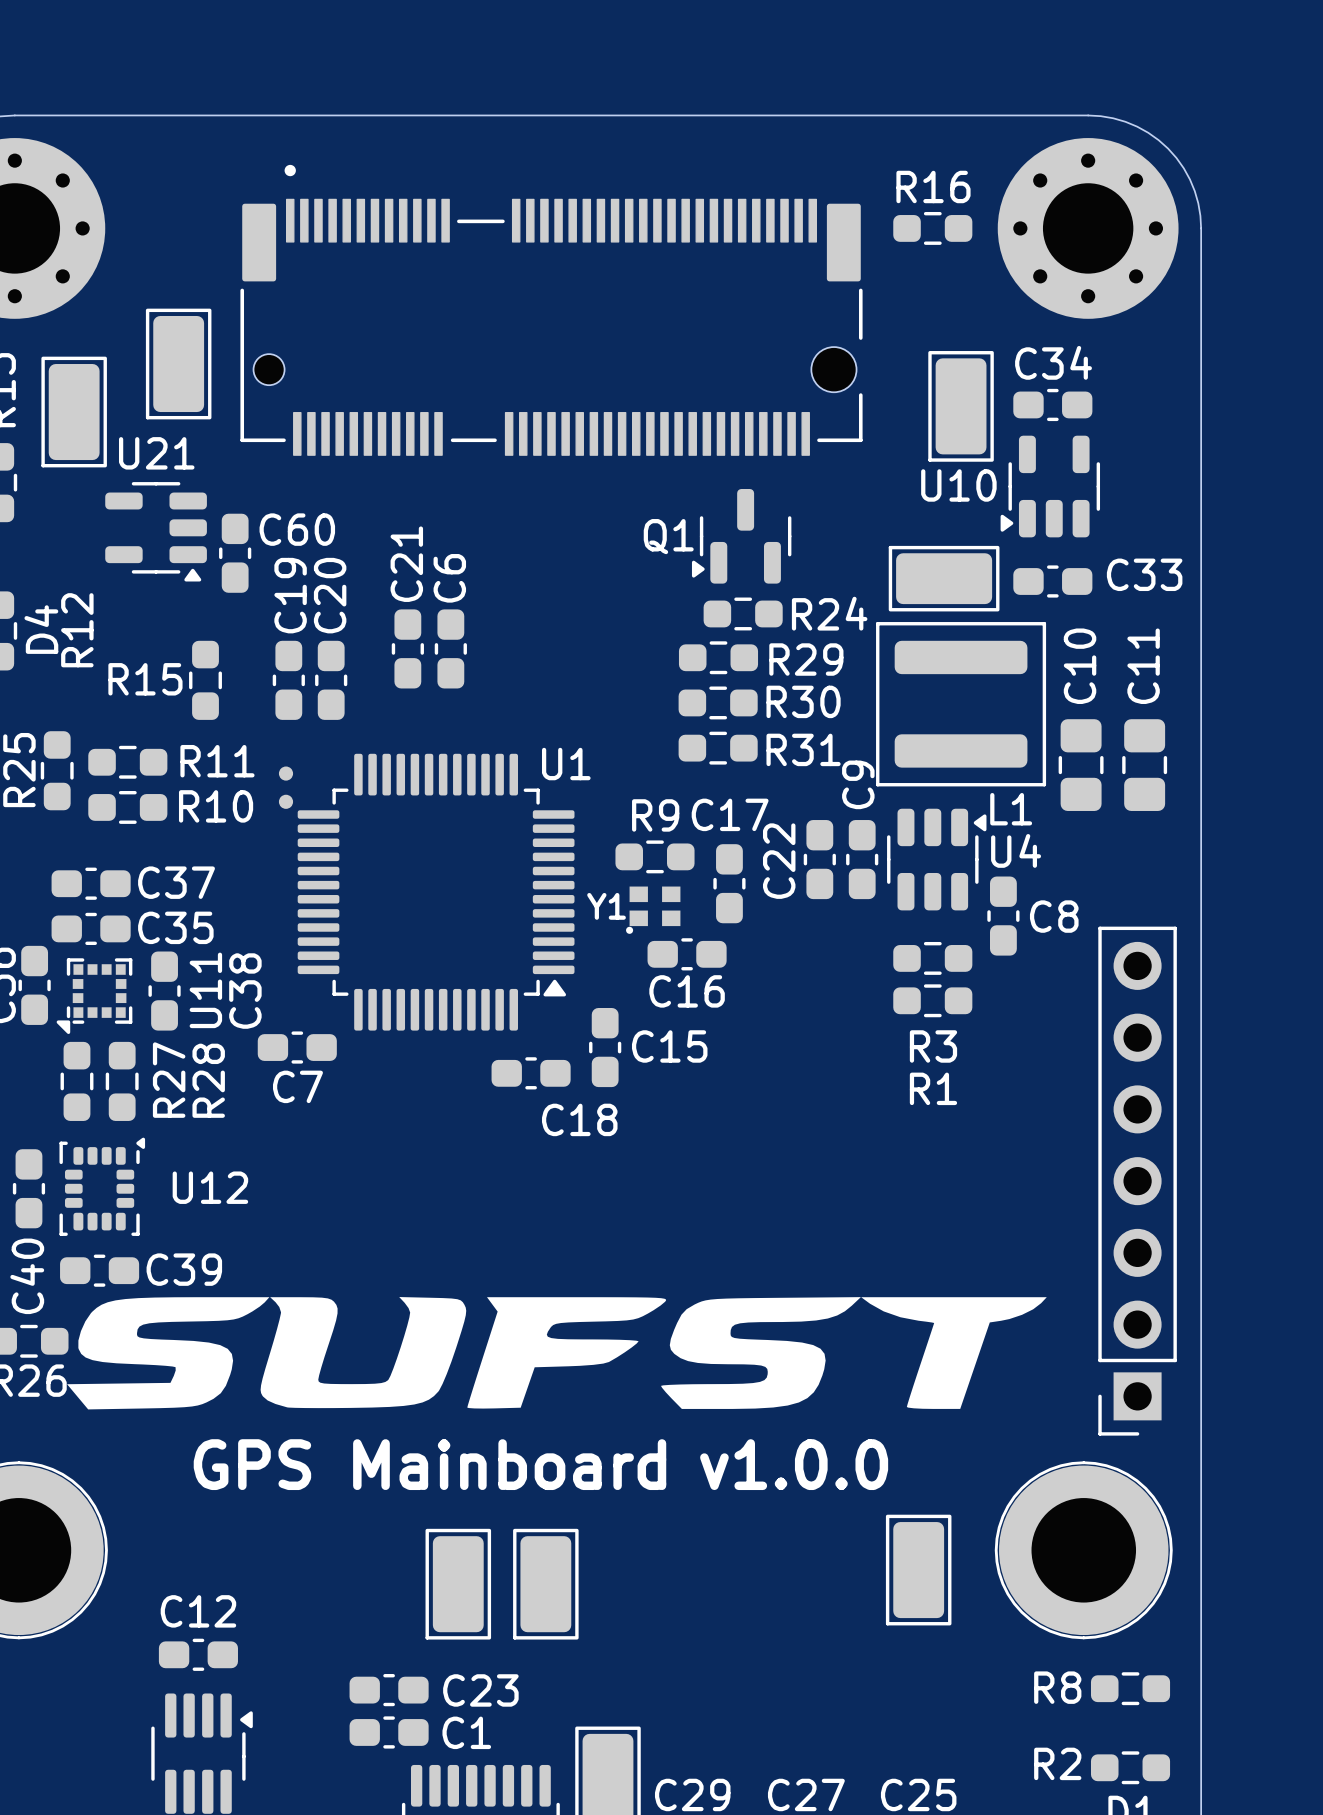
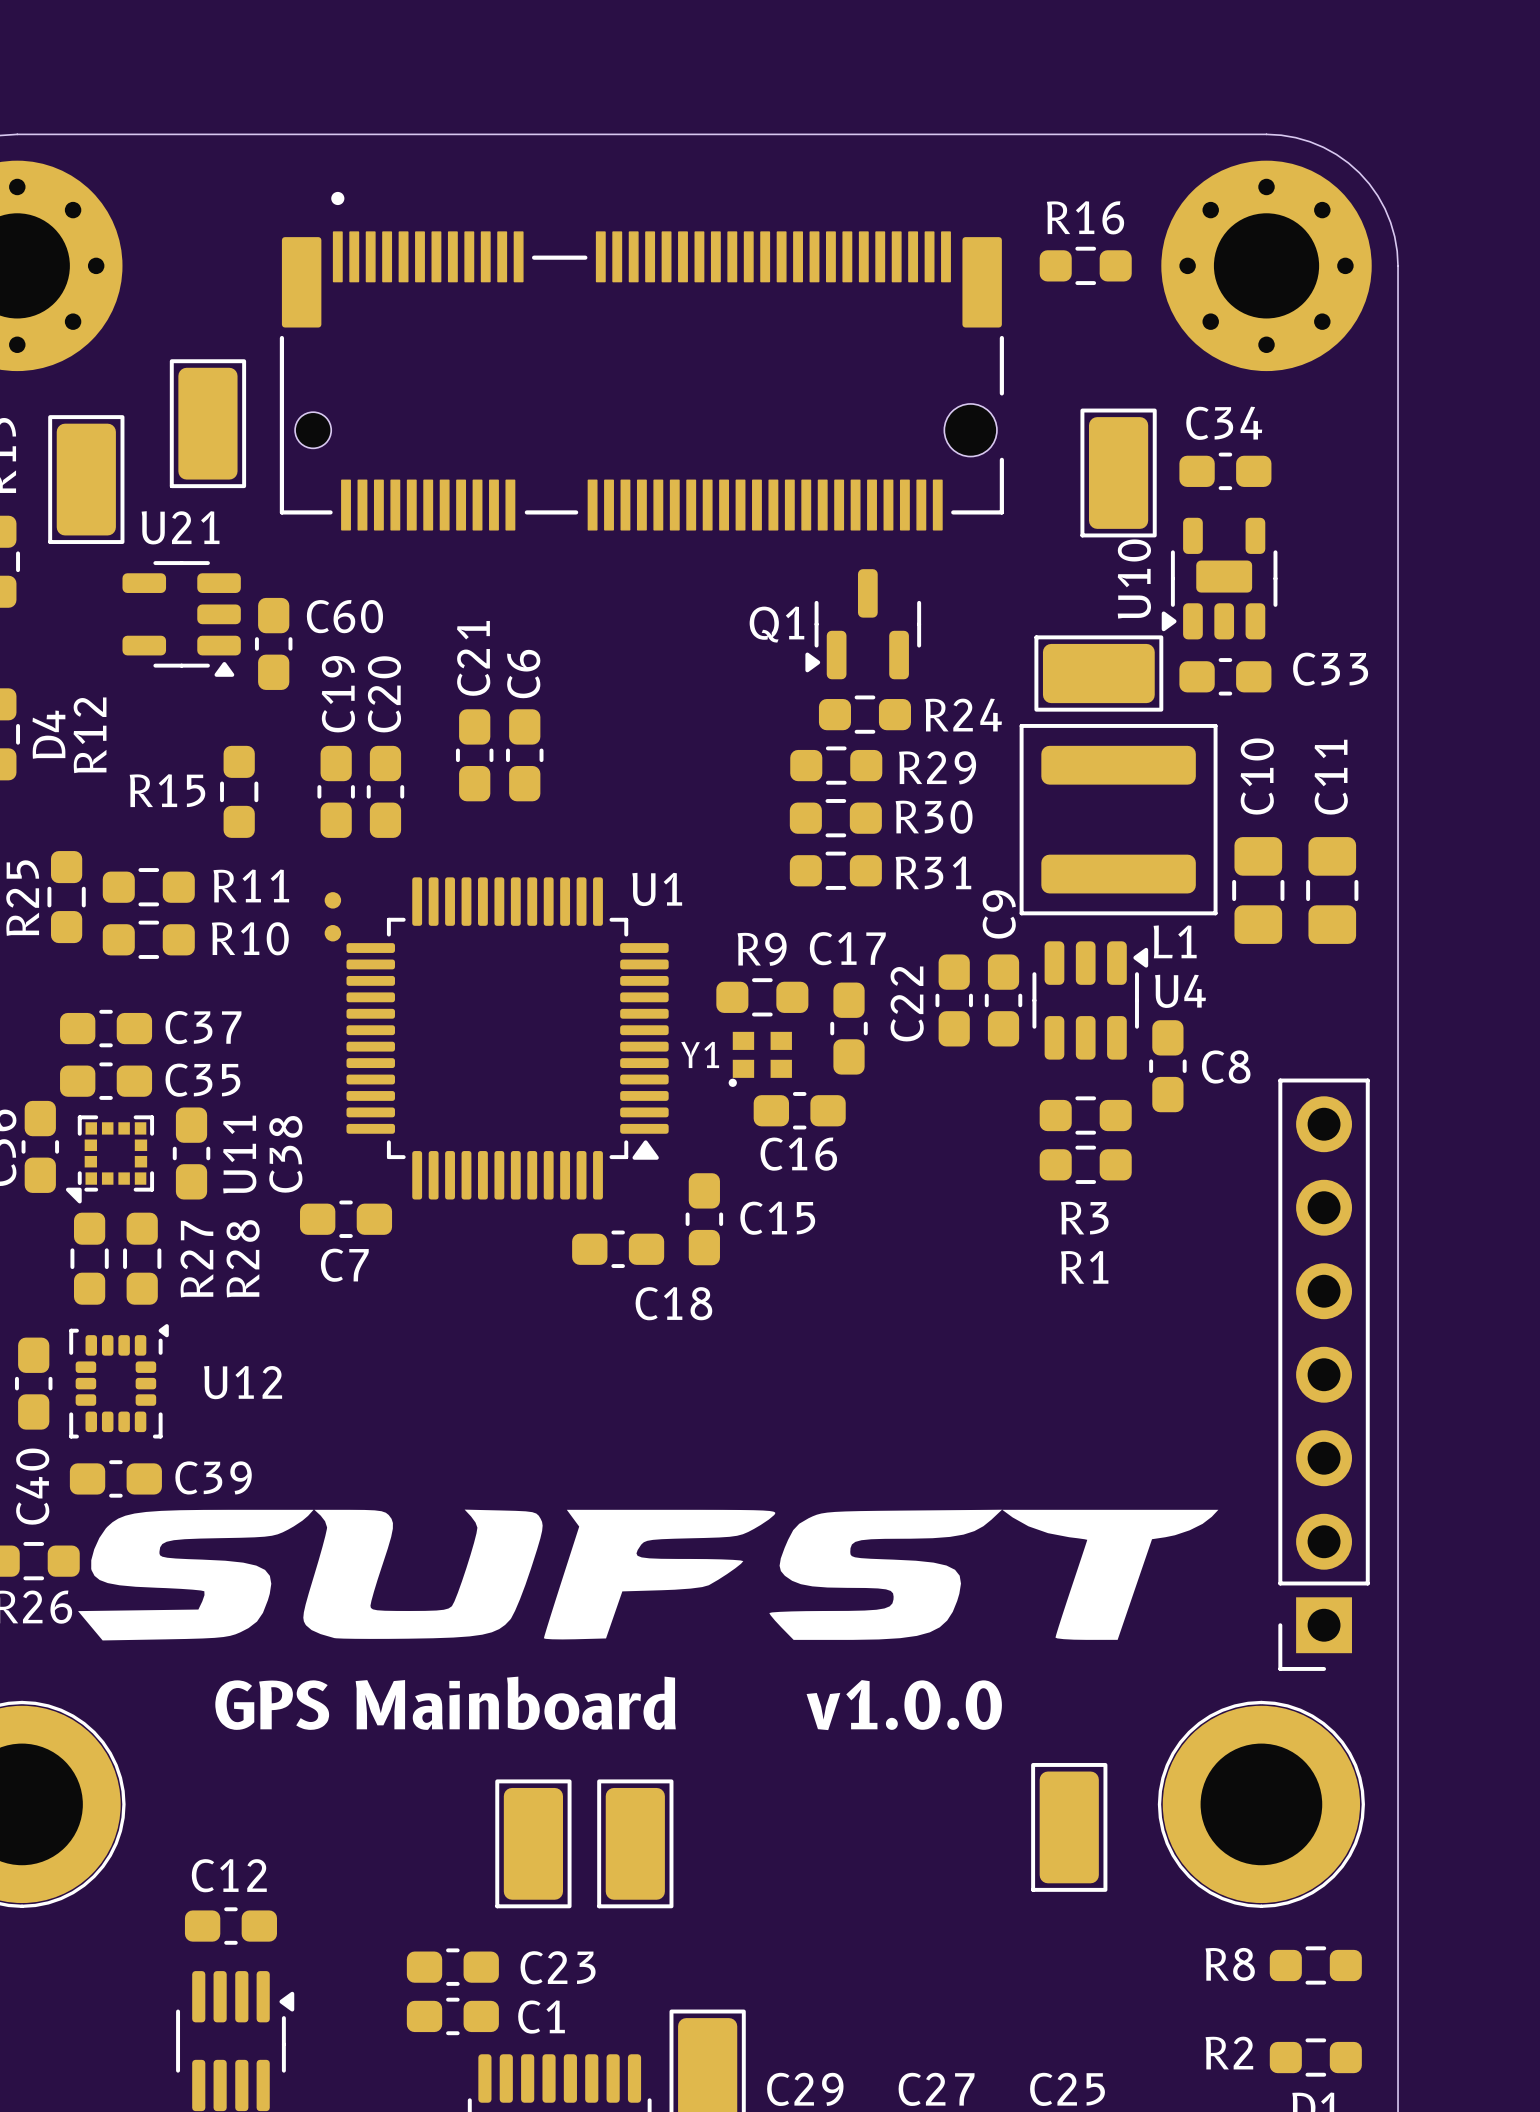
U10 footprint: [1000, 435, 1101, 538] -> [1161, 517, 1278, 640]
U10 name rotation: 0° (958, 485) -> 90° counterclockwise (1134, 579)

